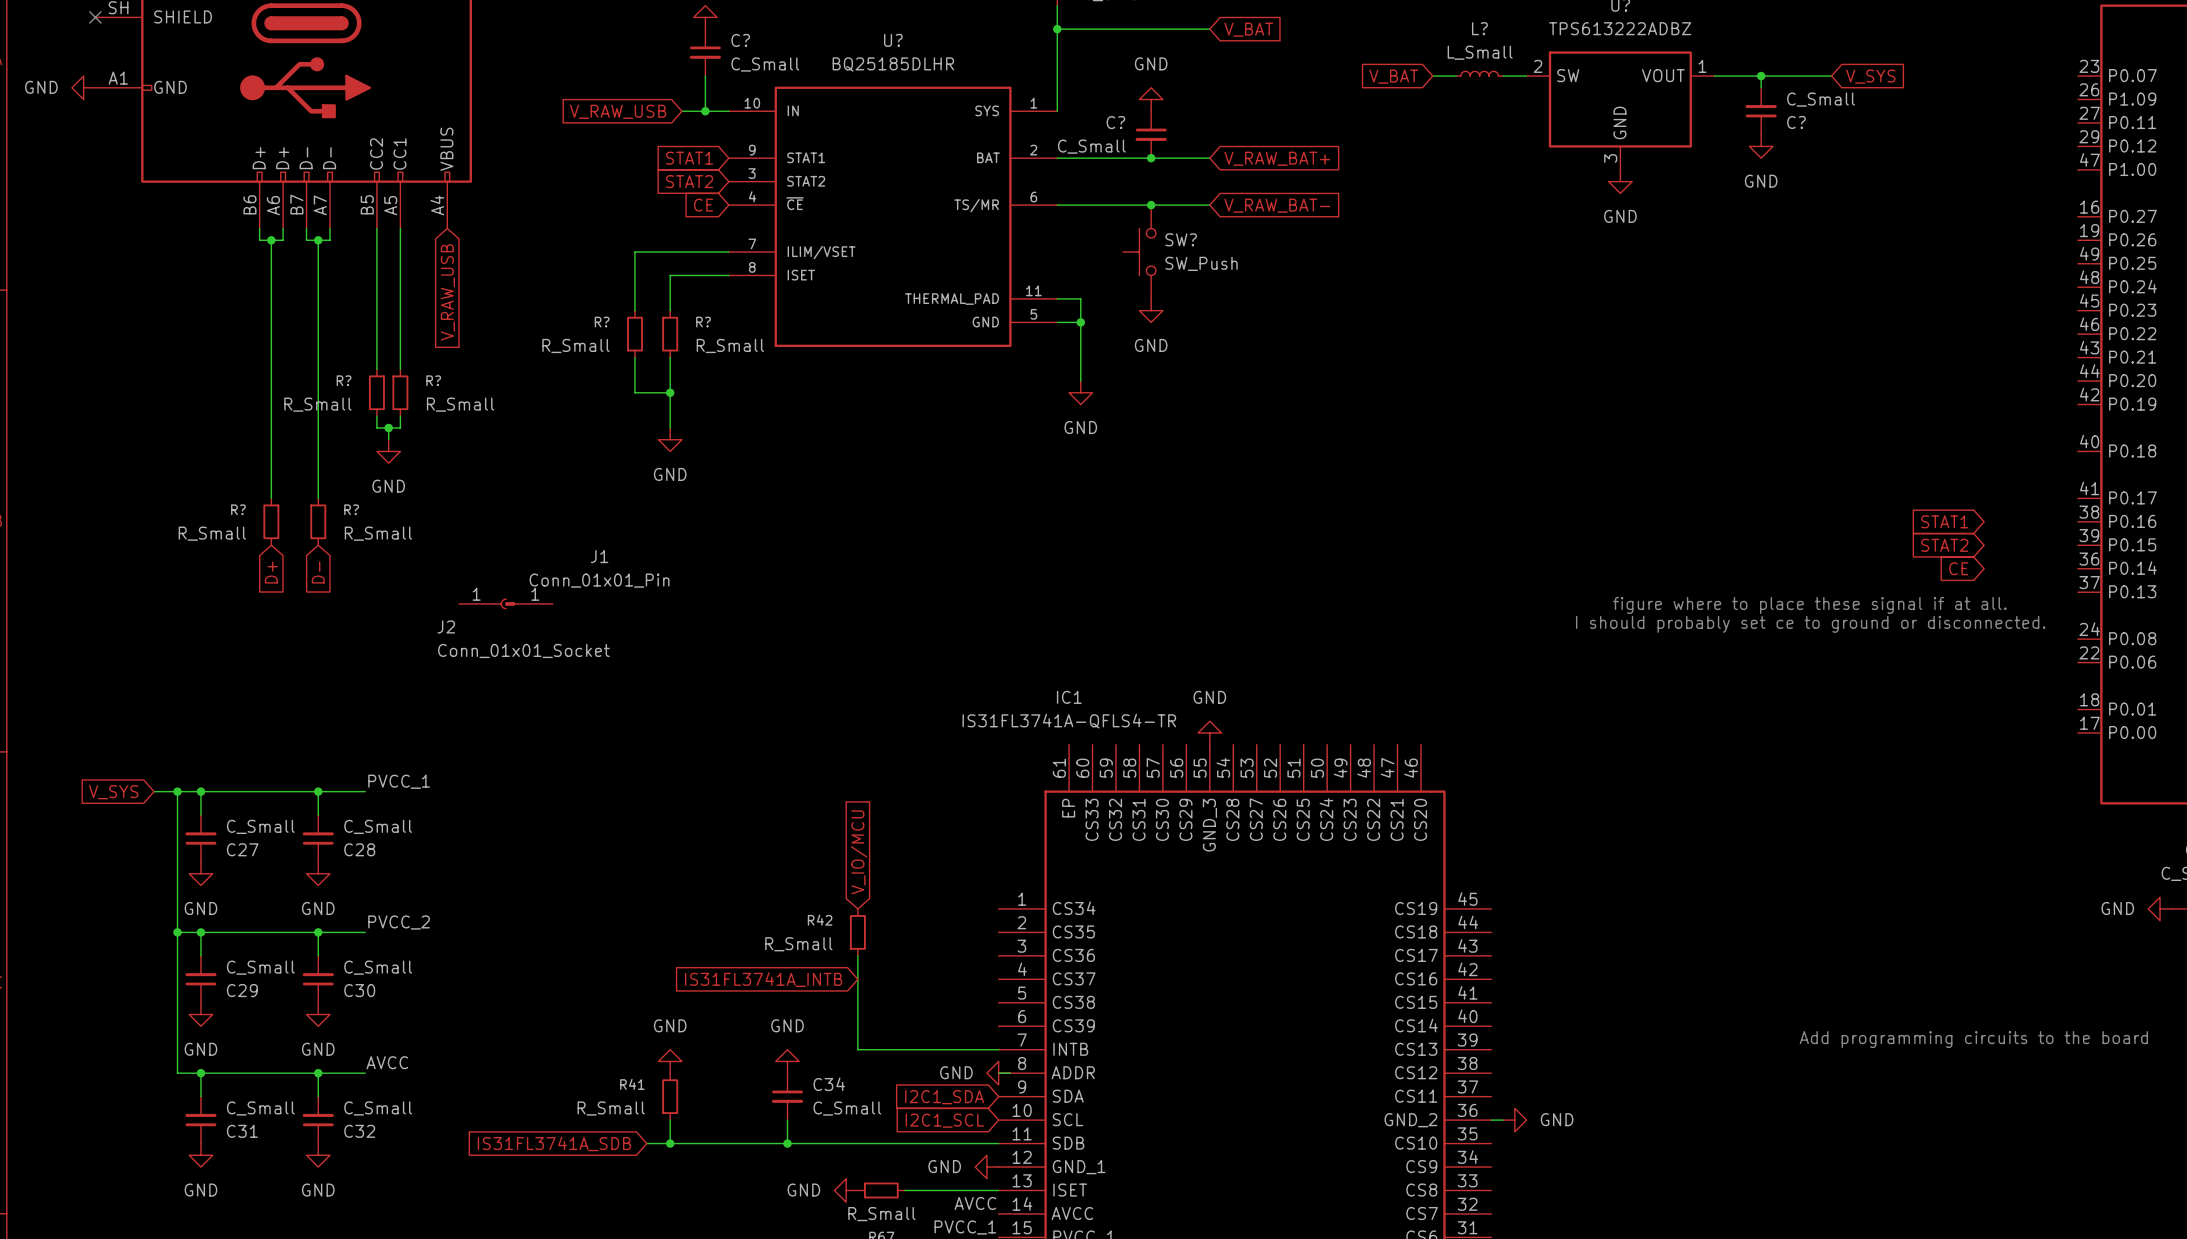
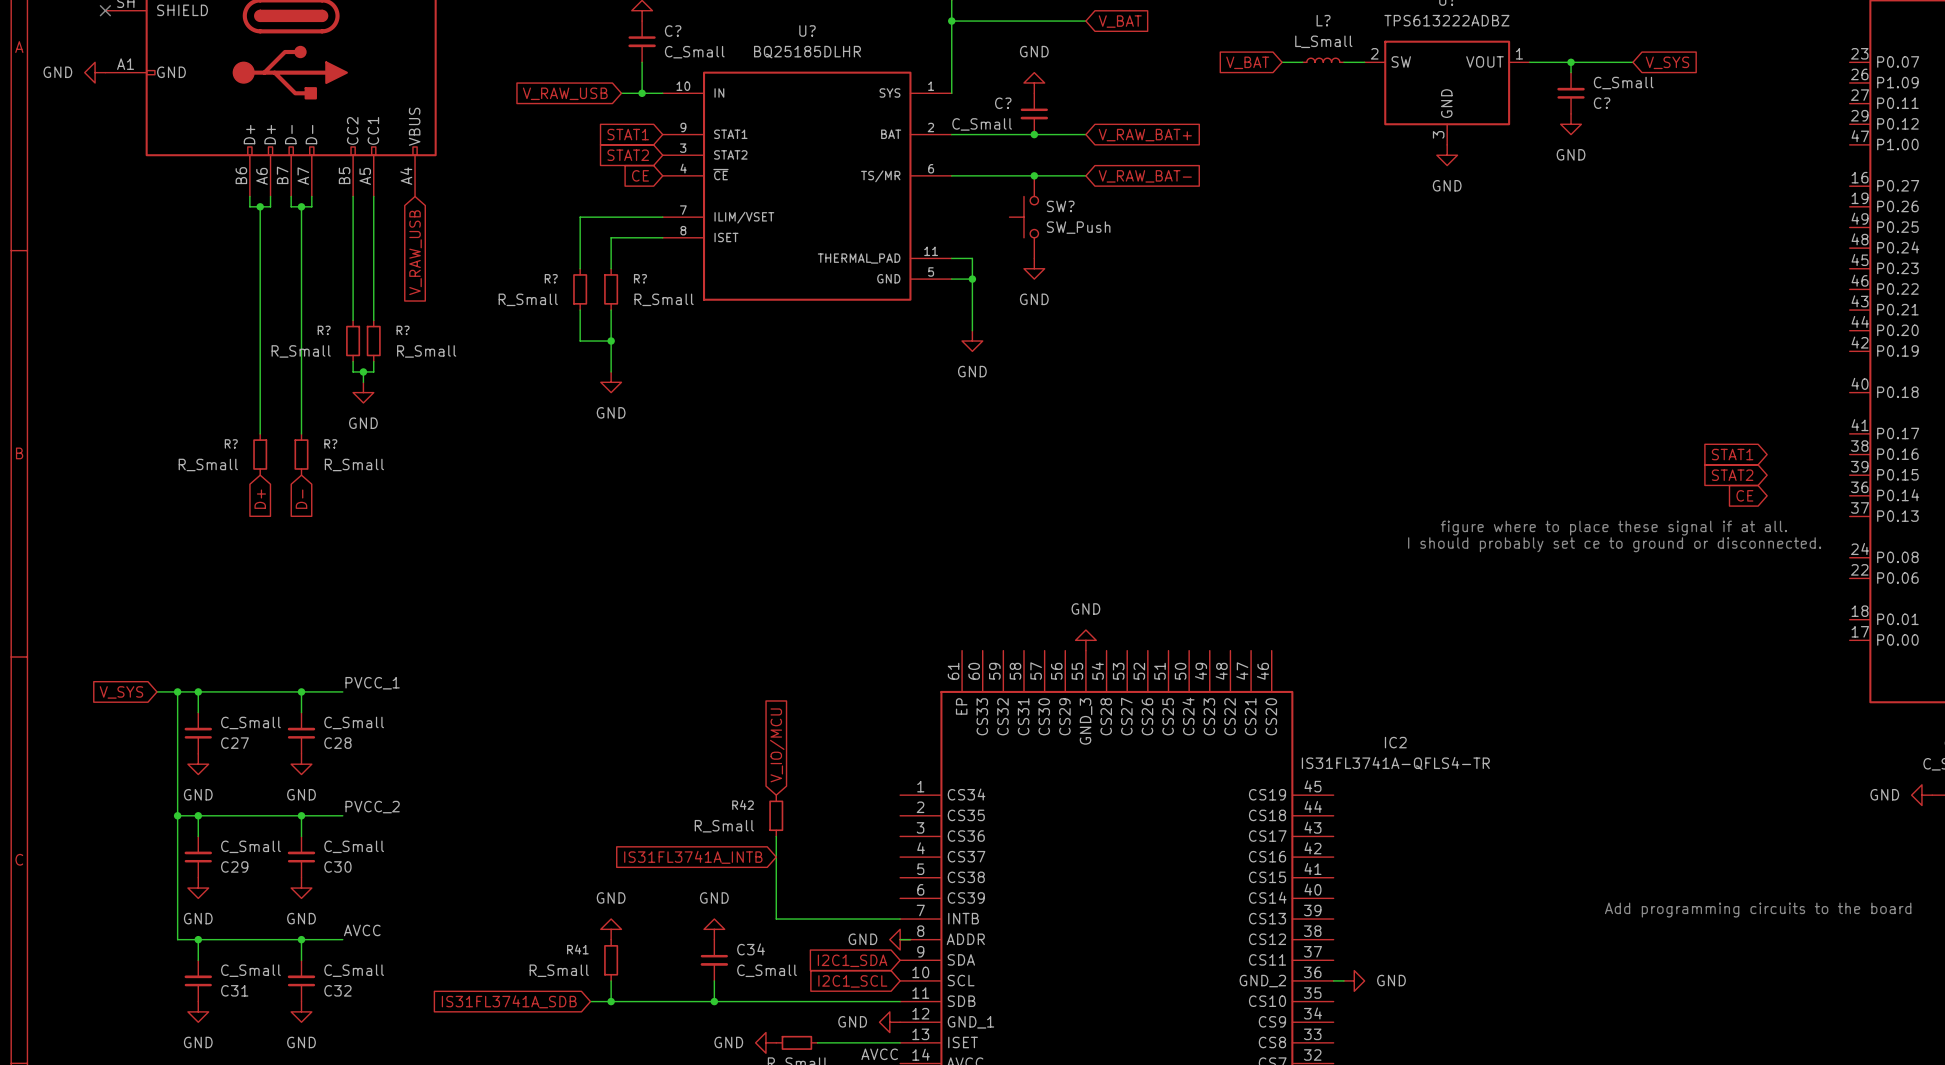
J2: Conn_01x01_Socket (482, 603) -> none
J1: Conn_01x01_Pin (529, 603) -> none
IC1 name: IC1 (1069, 697) -> IC2 (1395, 742)
IC1 value position: IS31FL3741A-QFLS4-TR (1069, 721) -> IS31FL3741A-QFLS4-TR (1395, 763)

